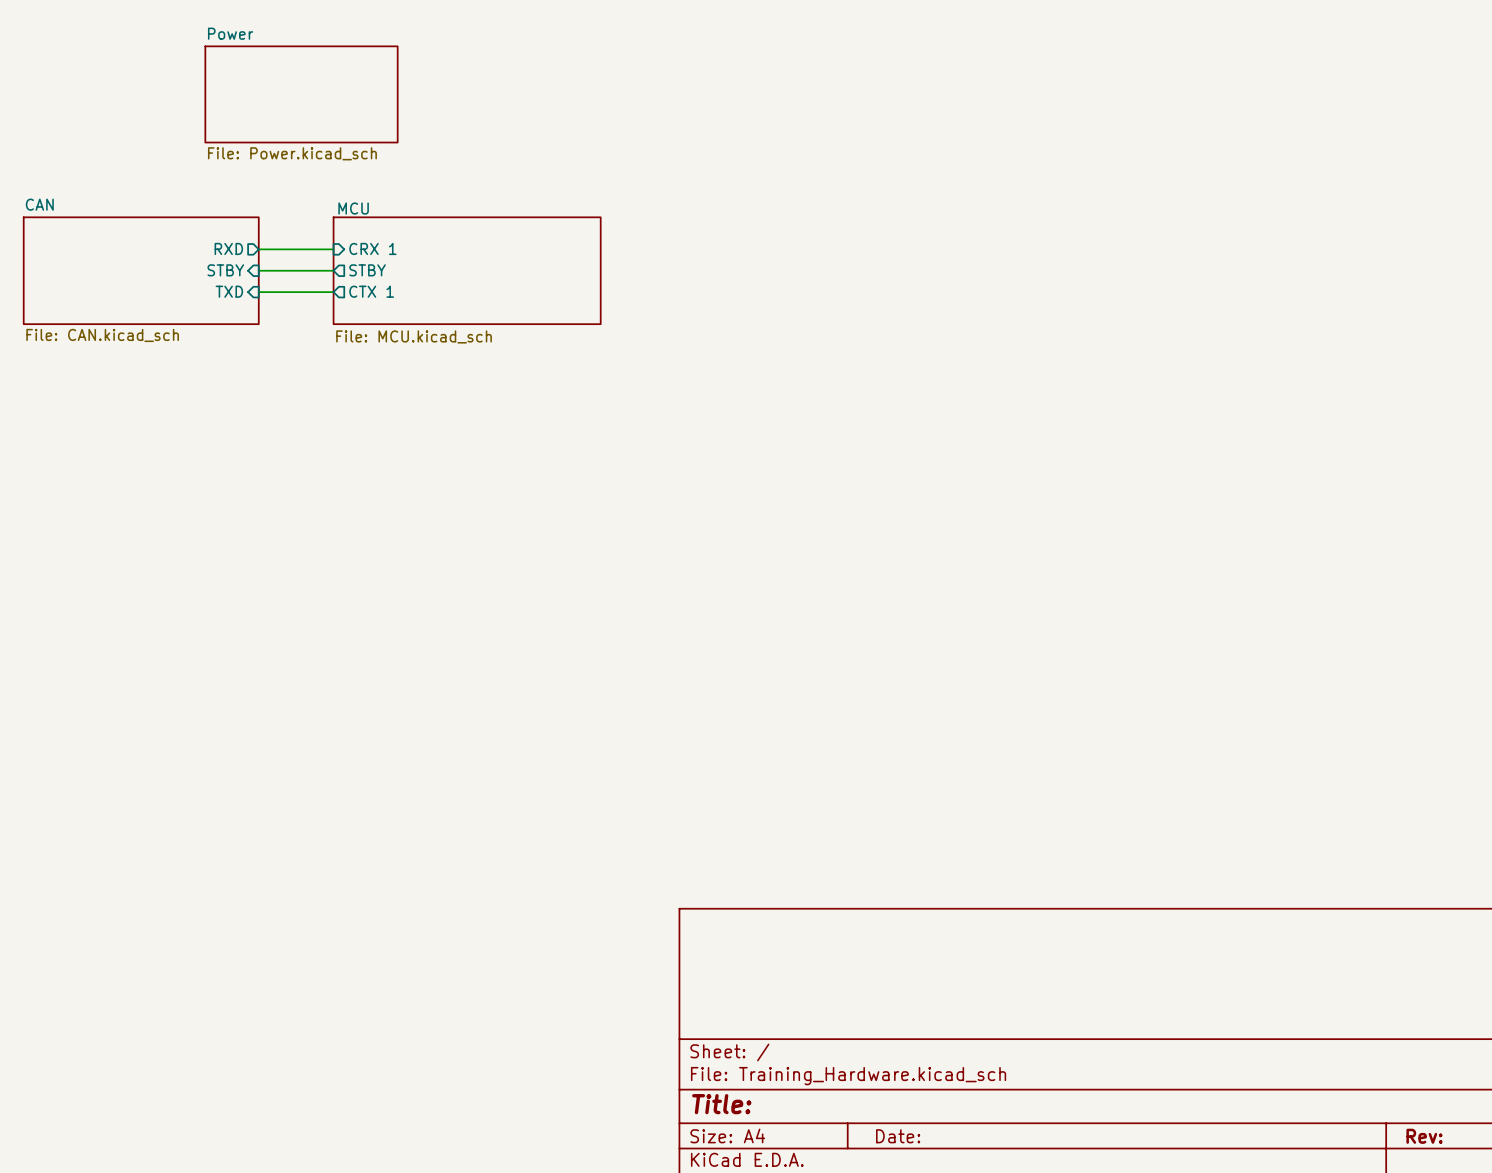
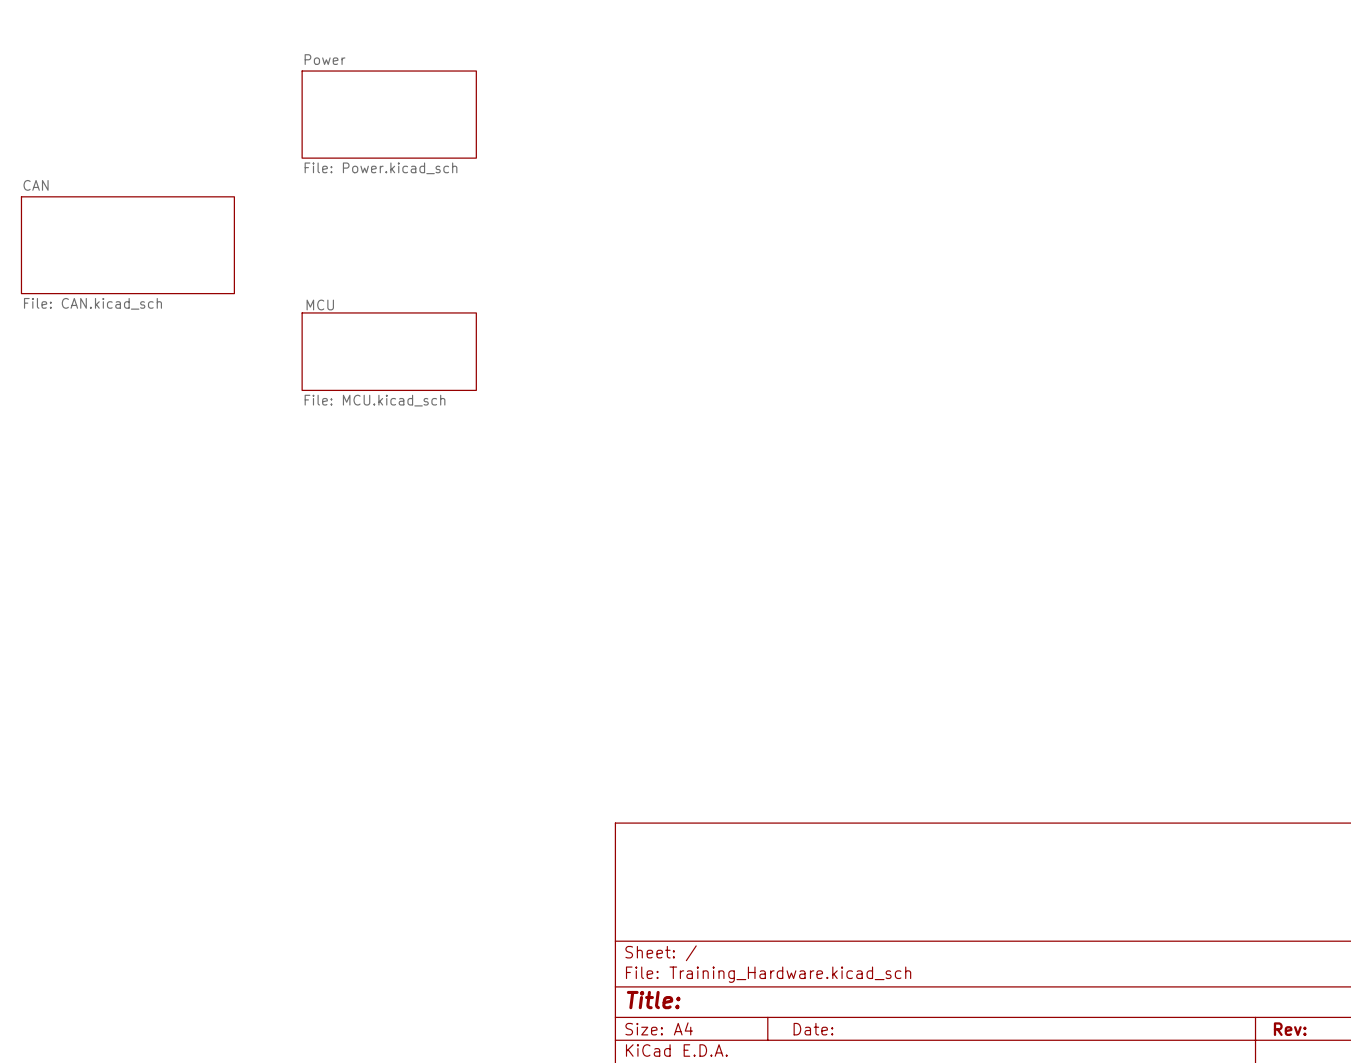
sheet Power position: (301, 94) -> (389, 114)
sheet pin: RXD (228, 248) -> none
sheet pin: CRX 1 (372, 248) -> none
wire: (258, 249) (333, 249) -> none
sheet pin: STBY (225, 270) -> none
wire: (258, 270) (333, 270) -> none
sheet pin: STBY (367, 270) -> none
sheet MCU: File: MCU.kicad_sch (467, 270) -> none
sheet pin: TXD (229, 291) -> none
sheet pin: CTX 1 (371, 291) -> none
wire: (258, 292) (333, 292) -> none
sheet MCU: none -> File: MCU.kicad_sch (389, 351)

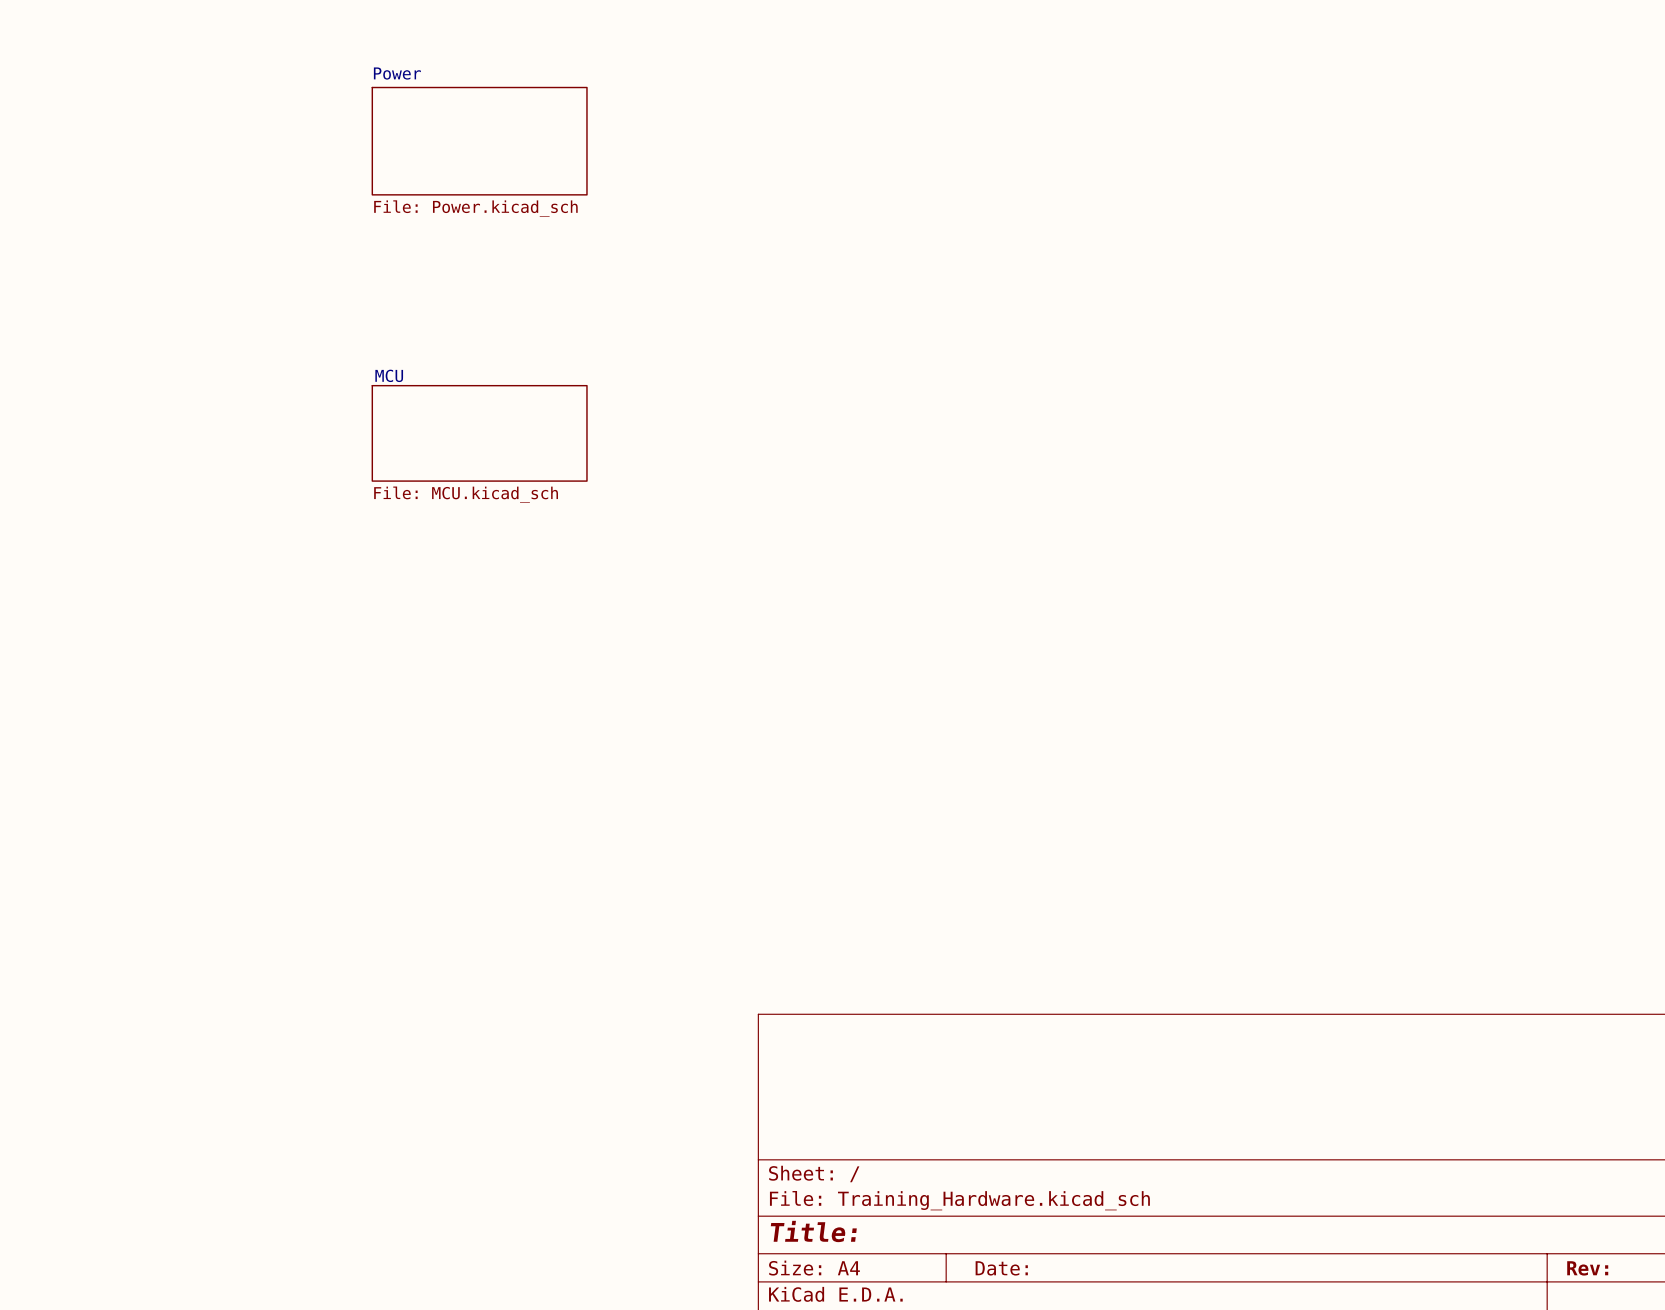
sheet CAN: File: CAN.kicad_sch (127, 245) -> none

